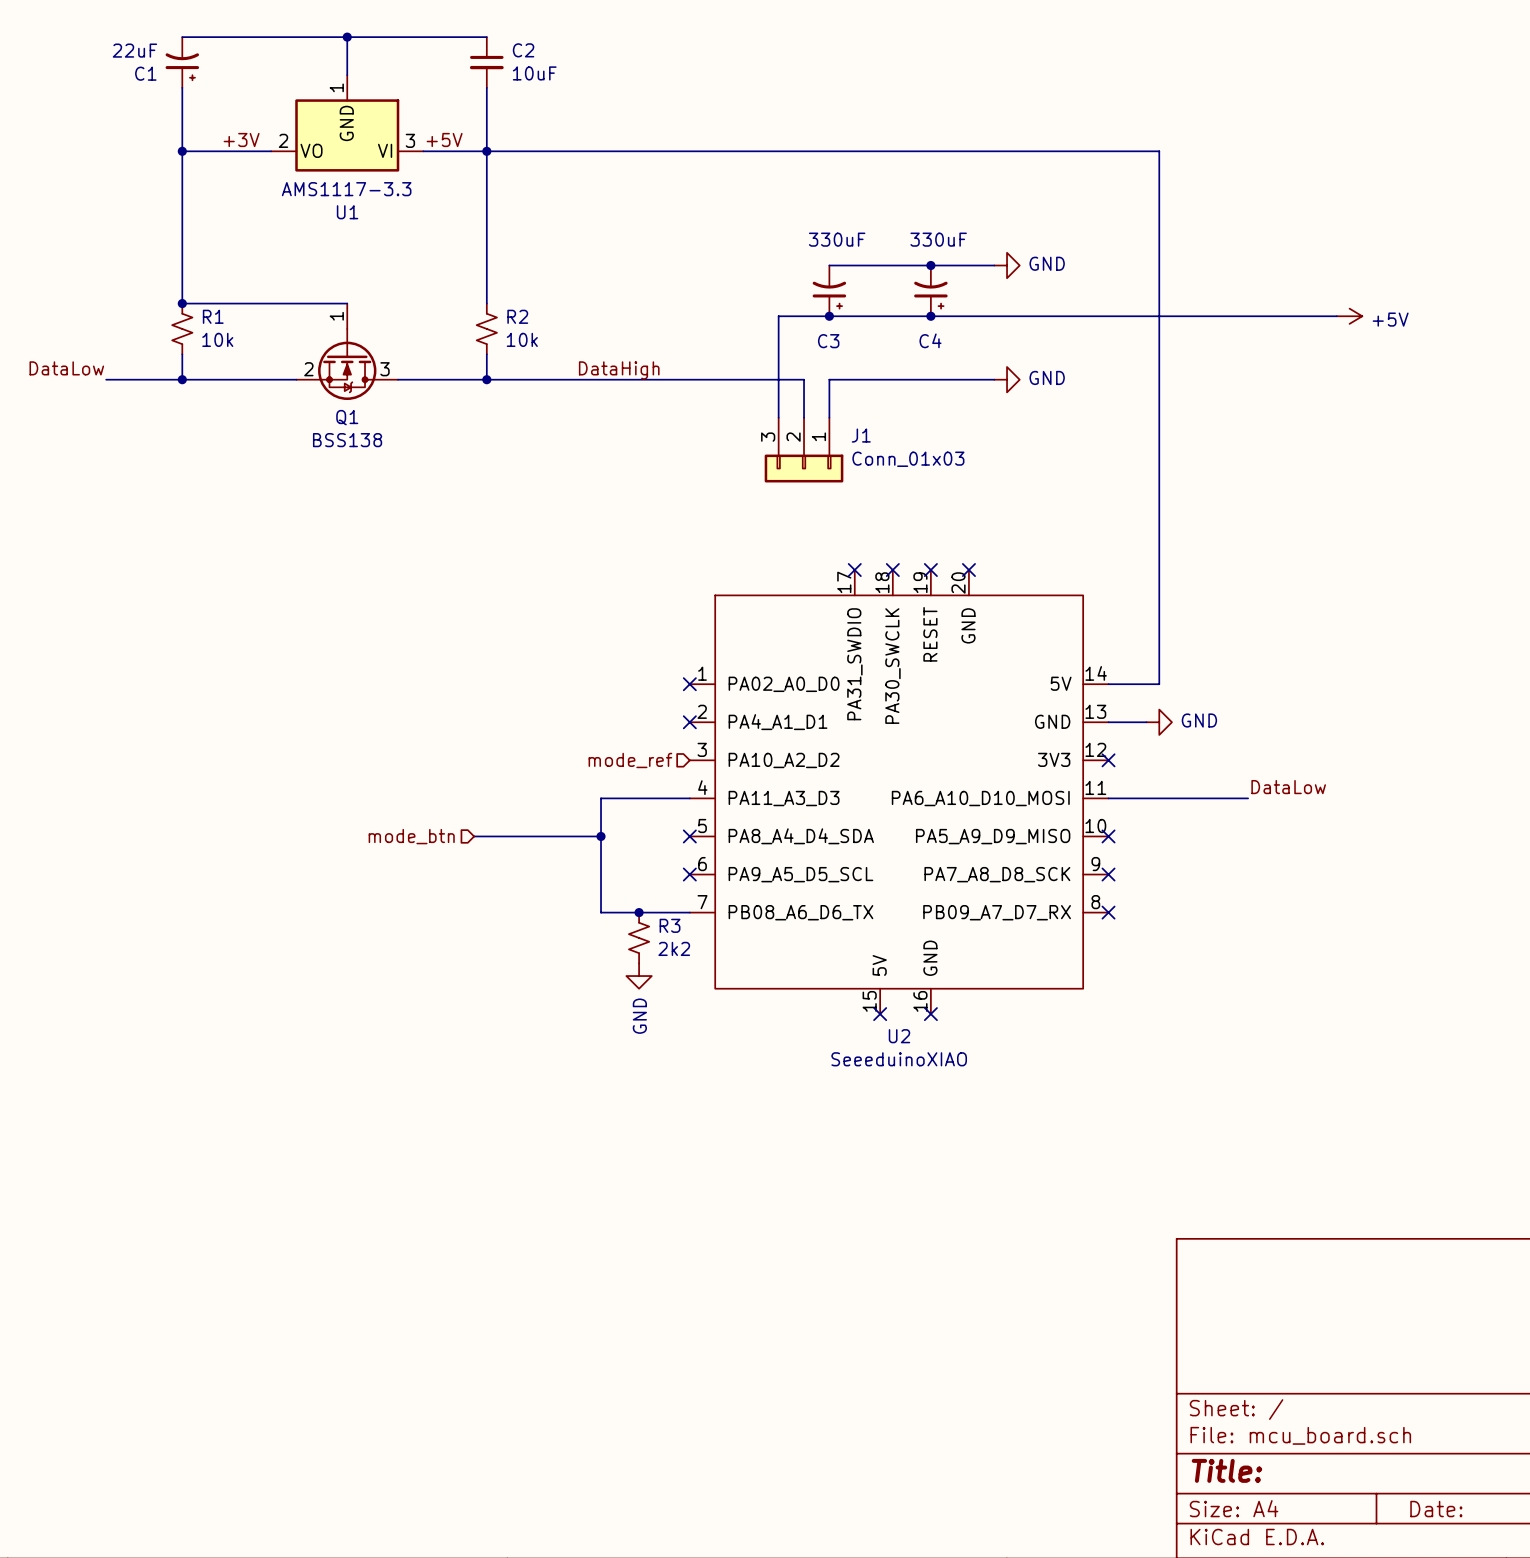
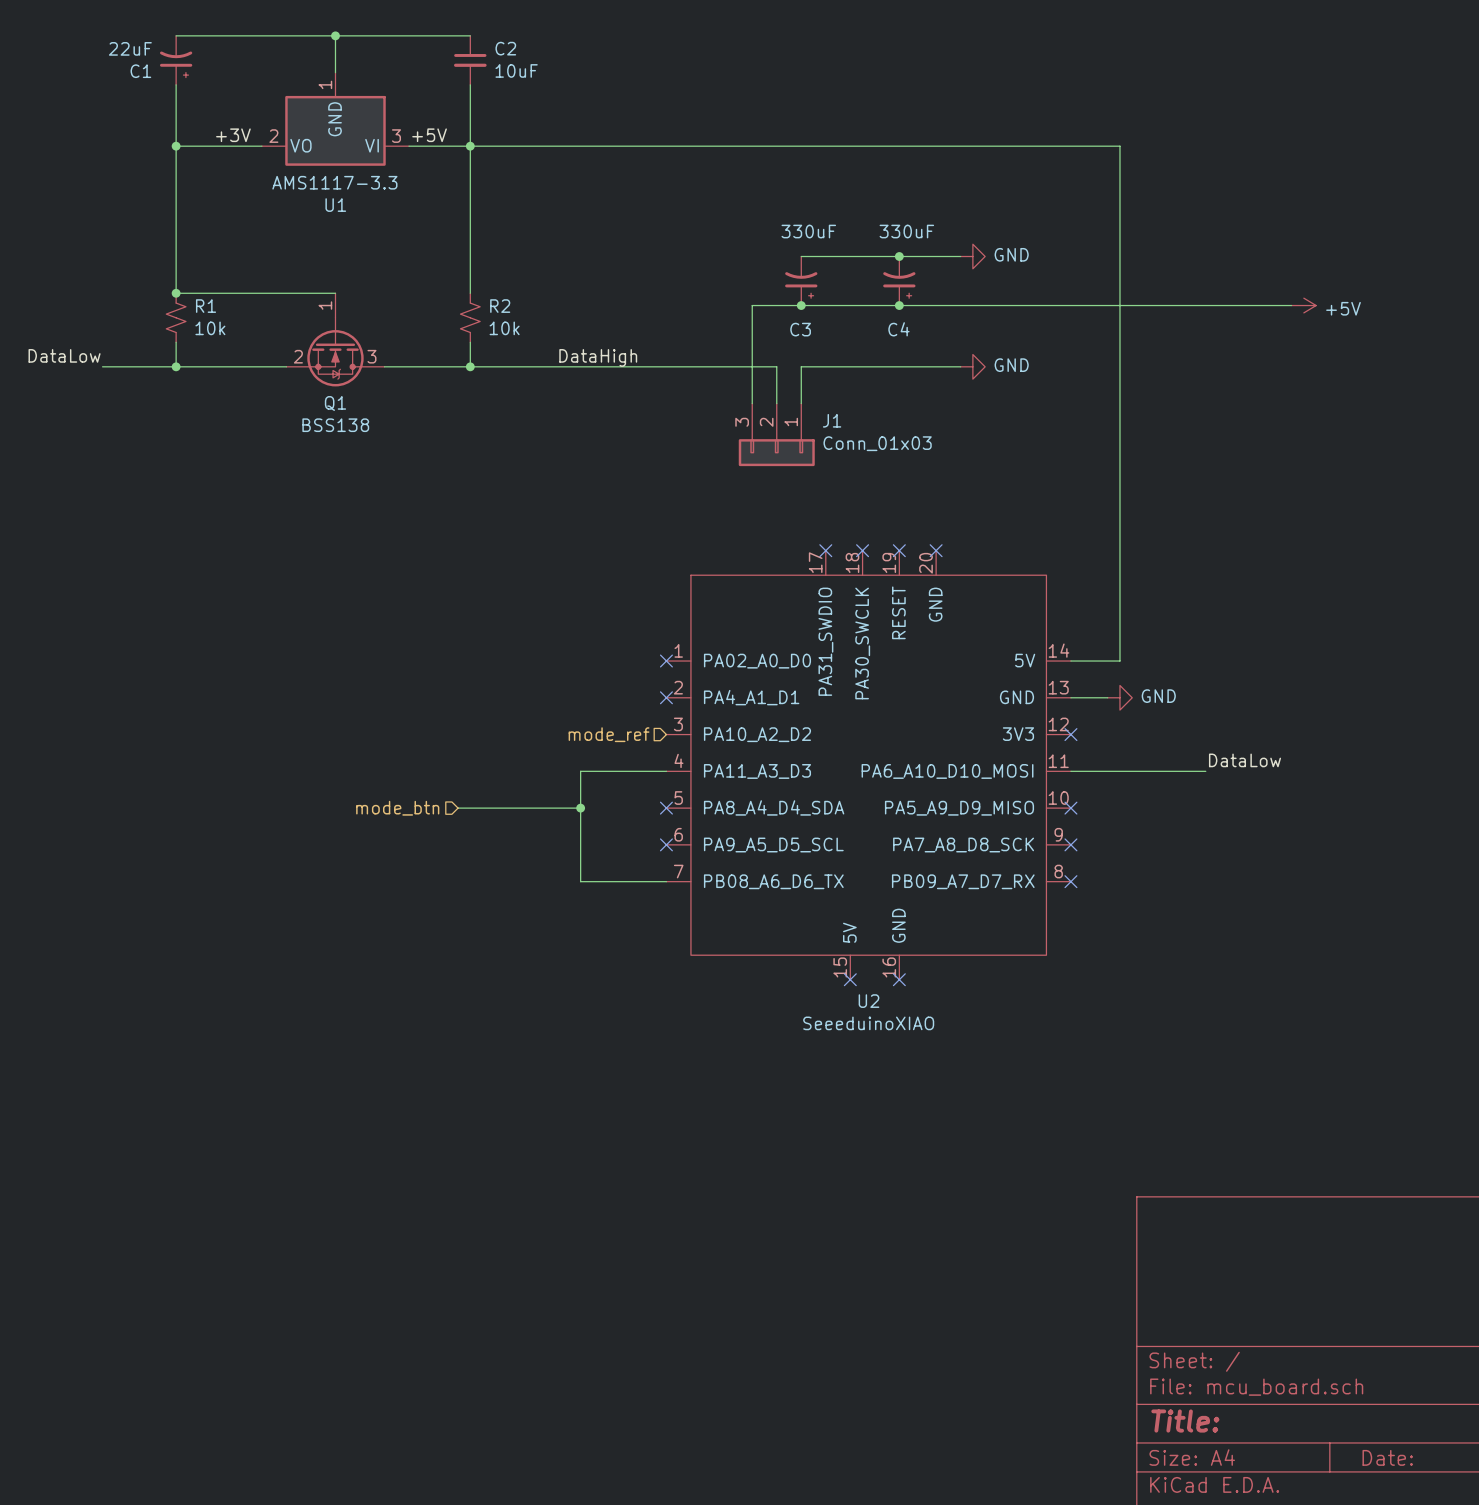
junction: (639, 912) -> none
R3: 2k2 (639, 937) -> none
power symbol: GND (639, 976) -> none

